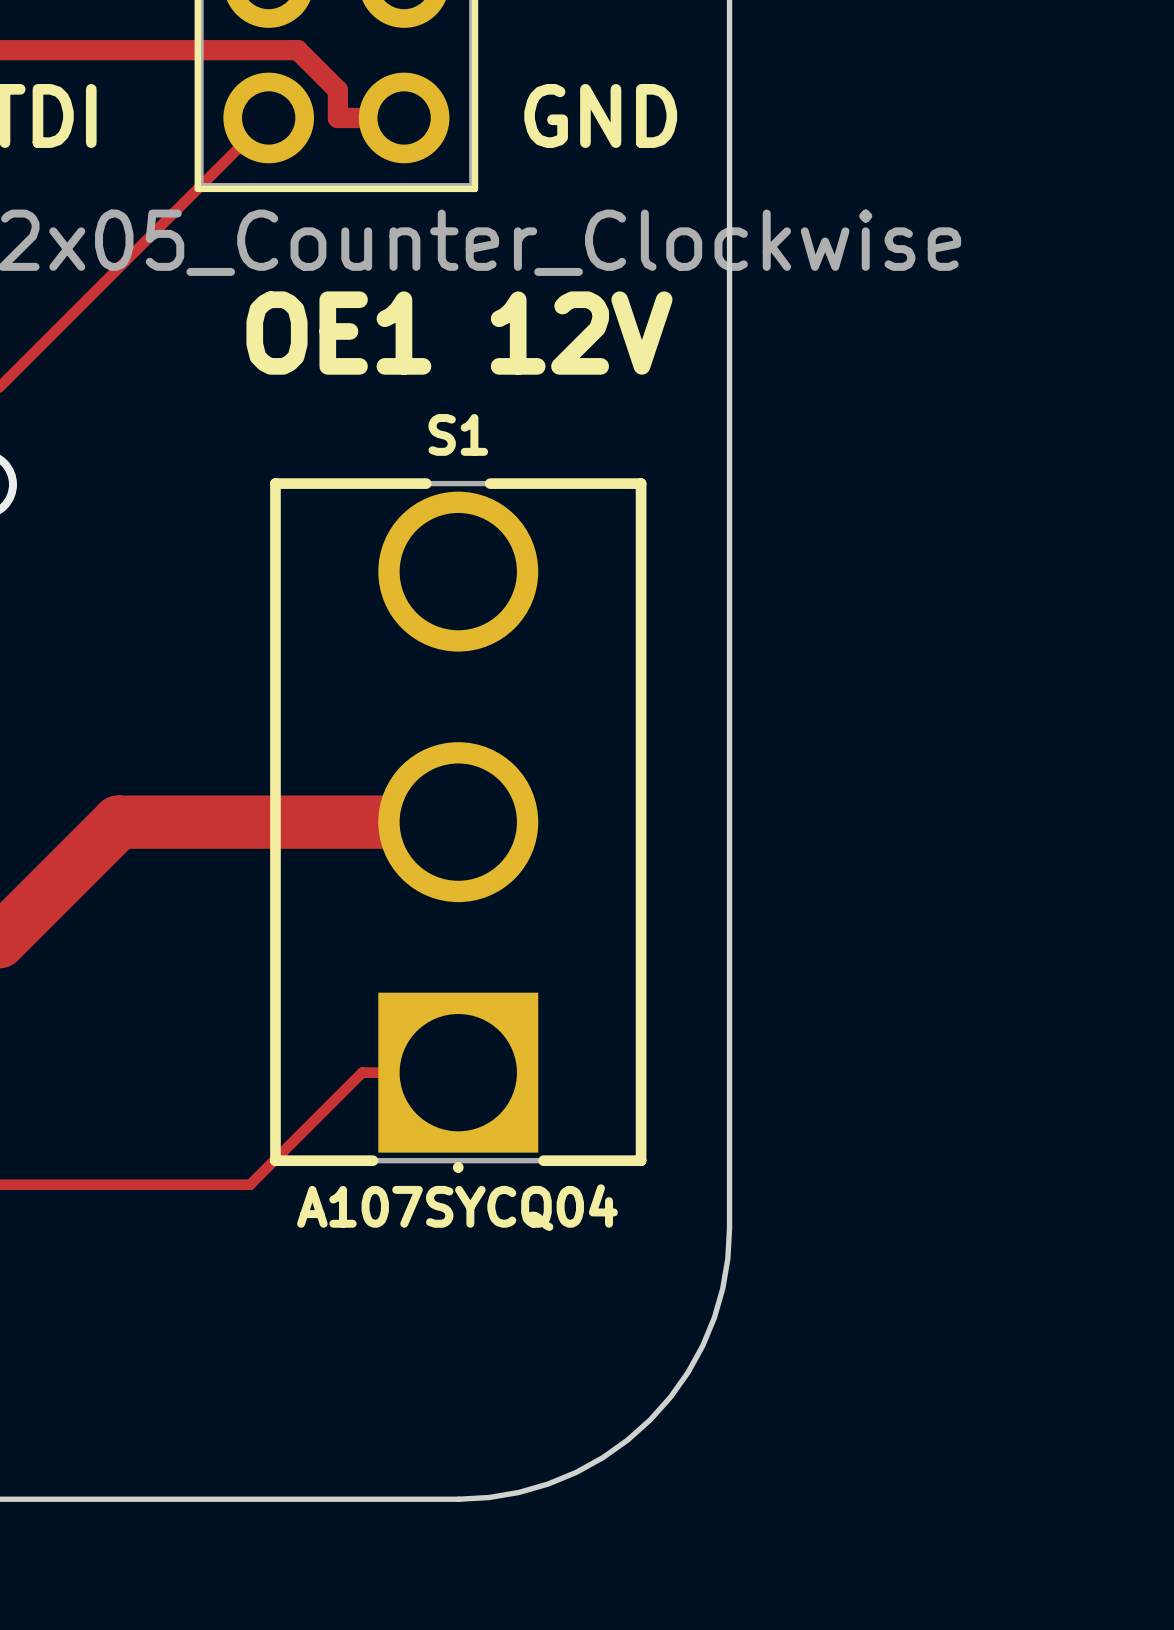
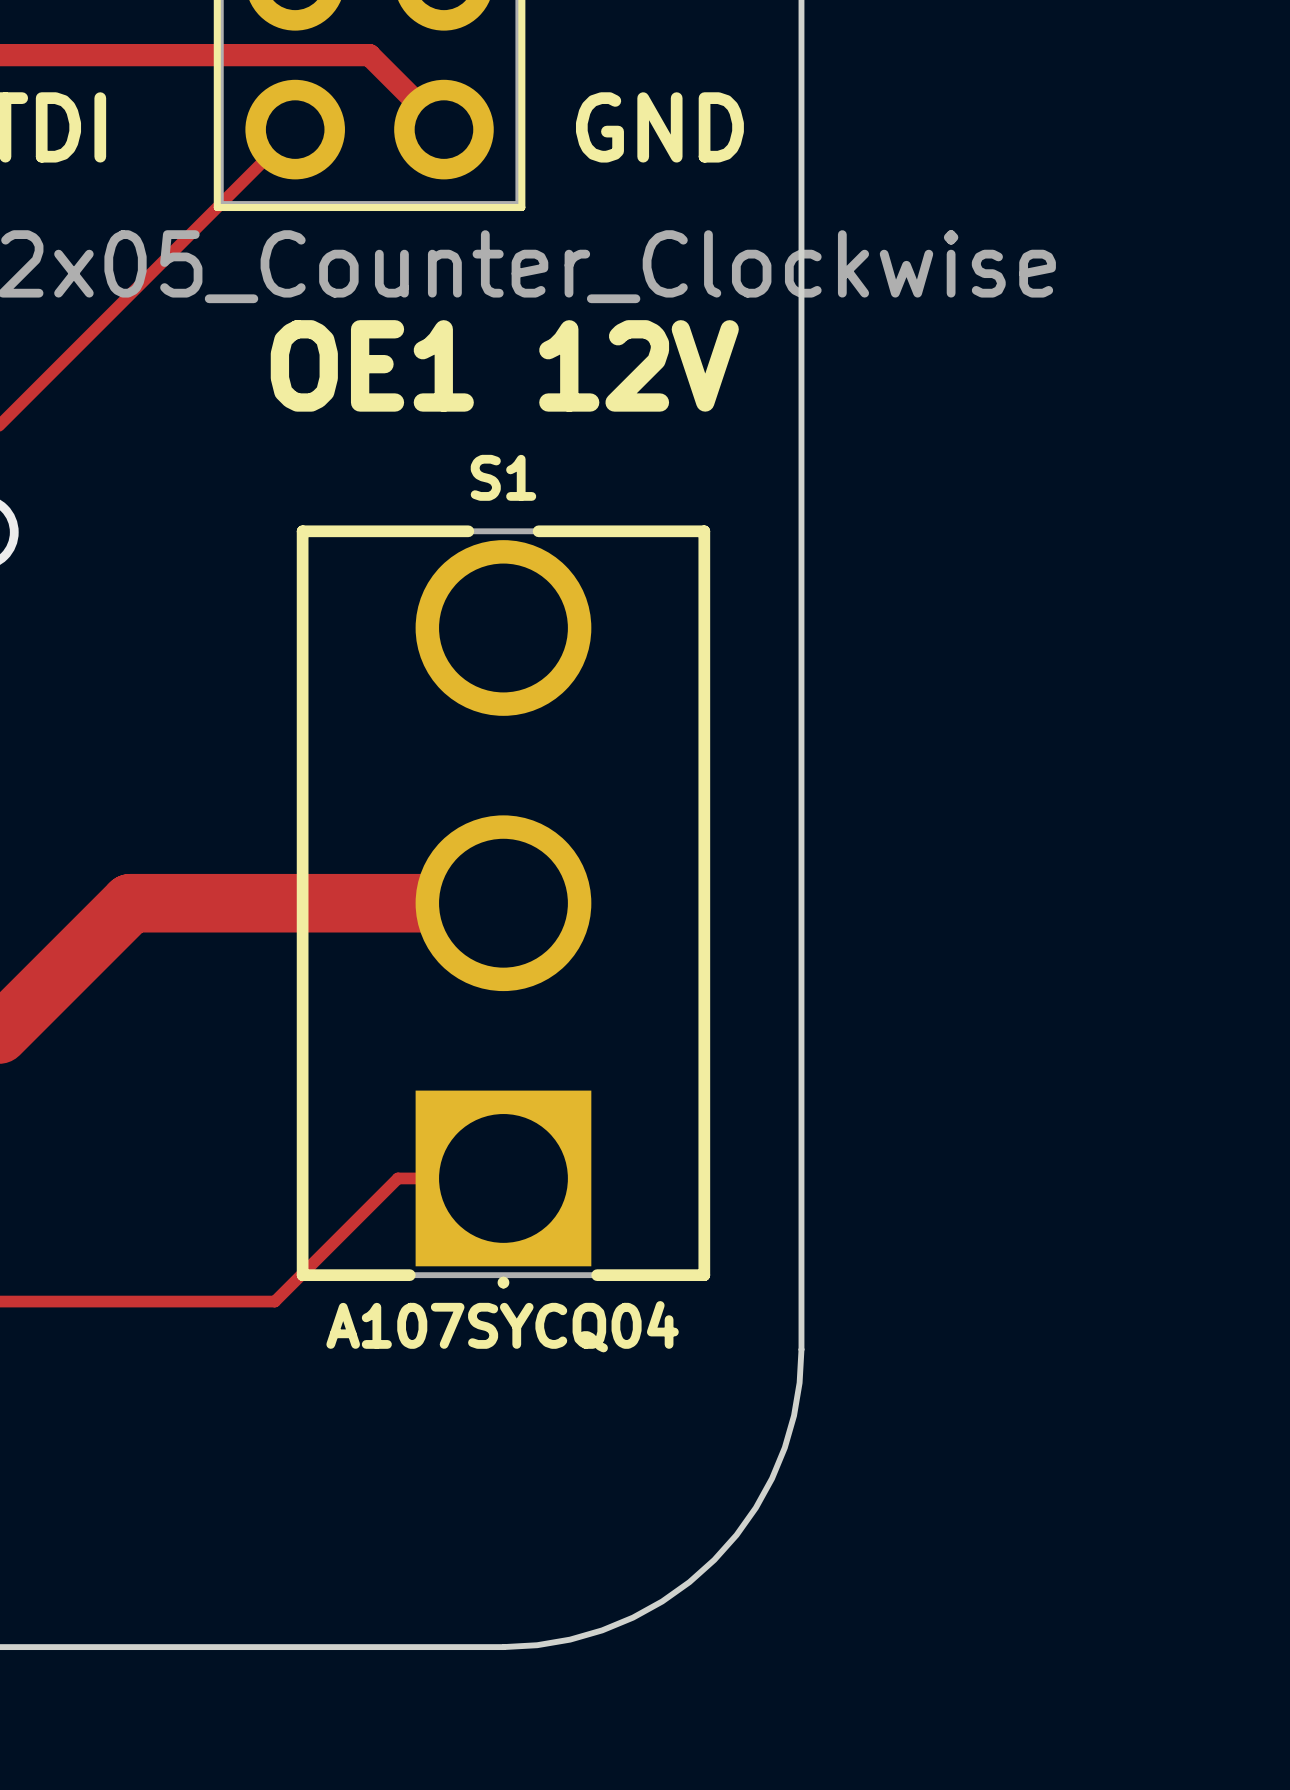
track: (297, 50) (337, 90) (337, 117) (404, 117) -> (327, 55) (369, 55) (443, 129)

